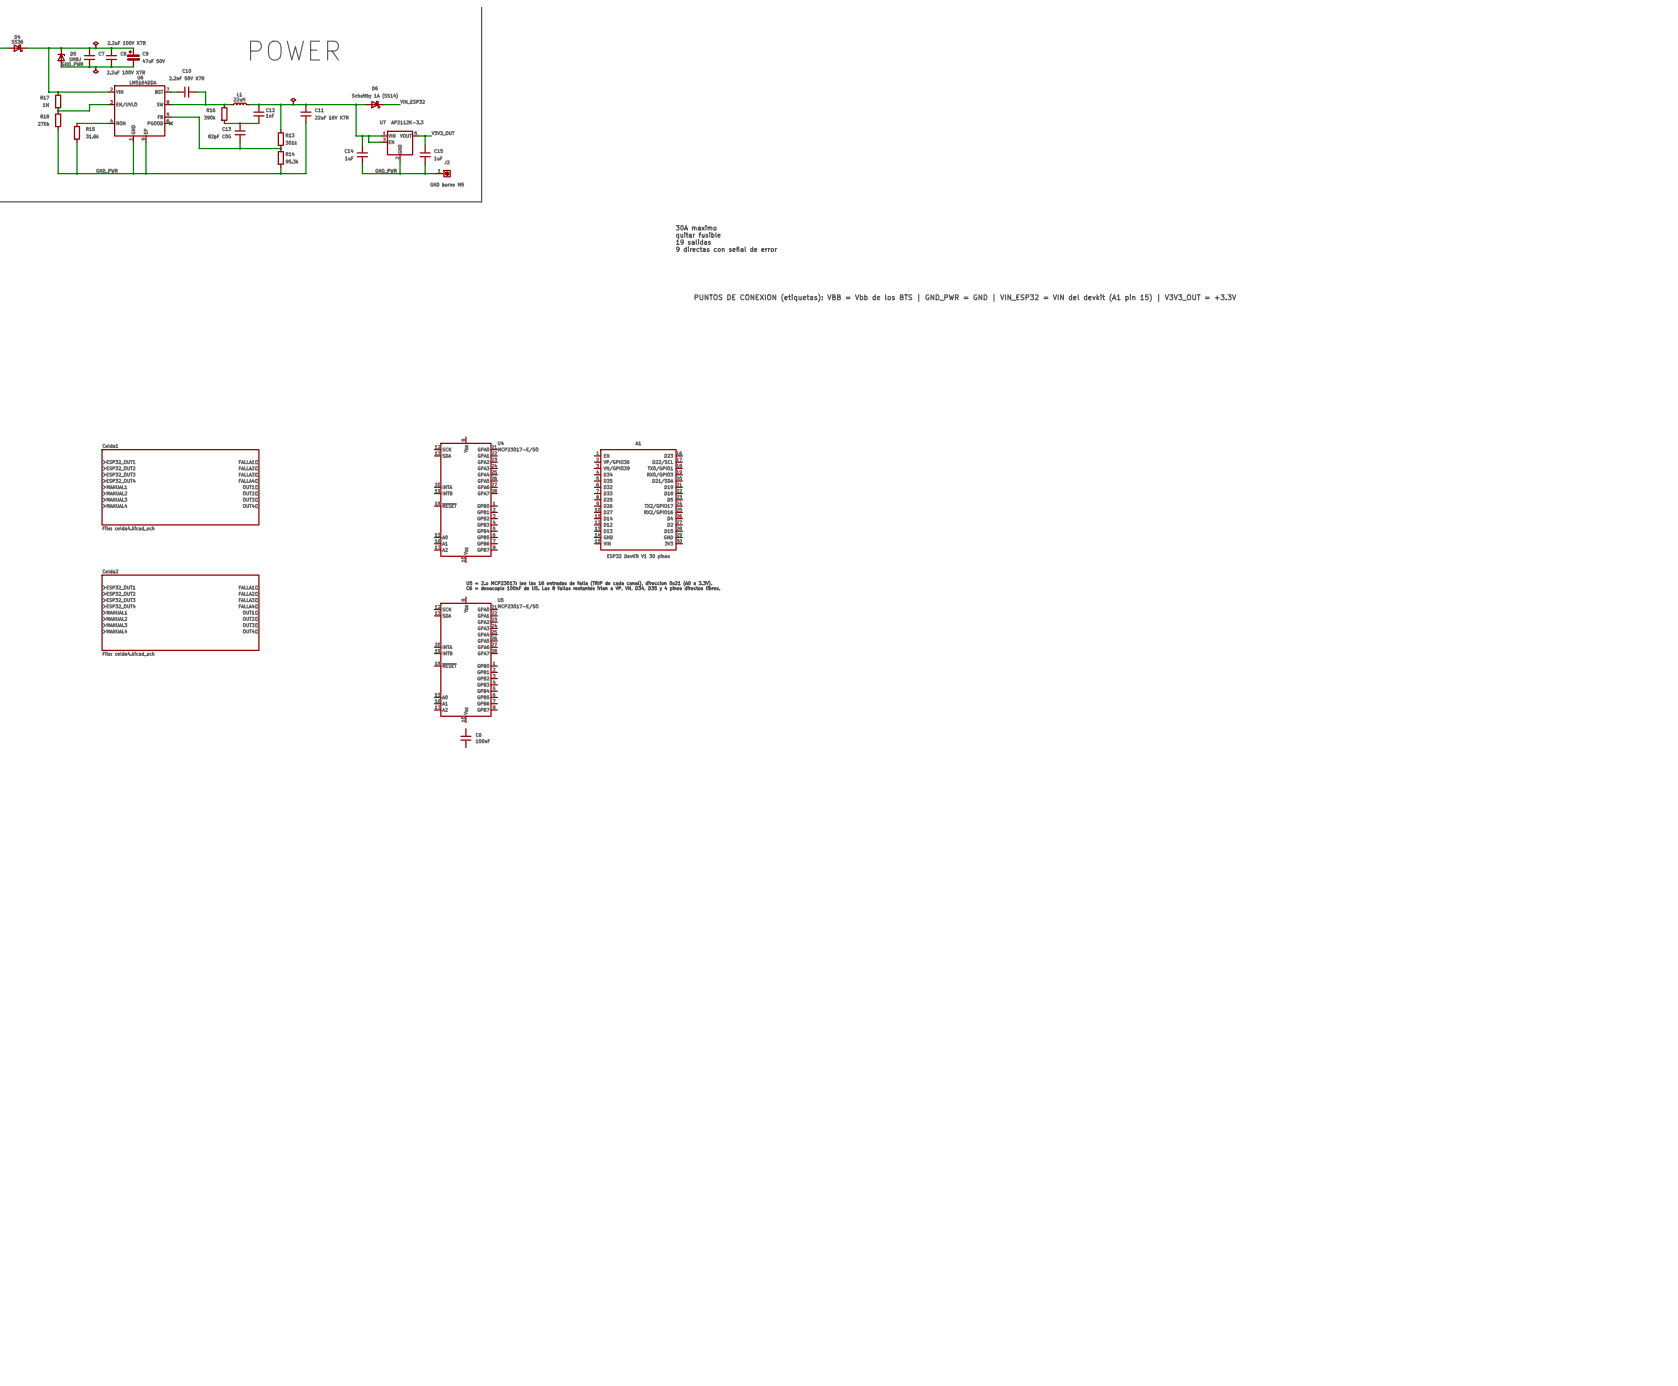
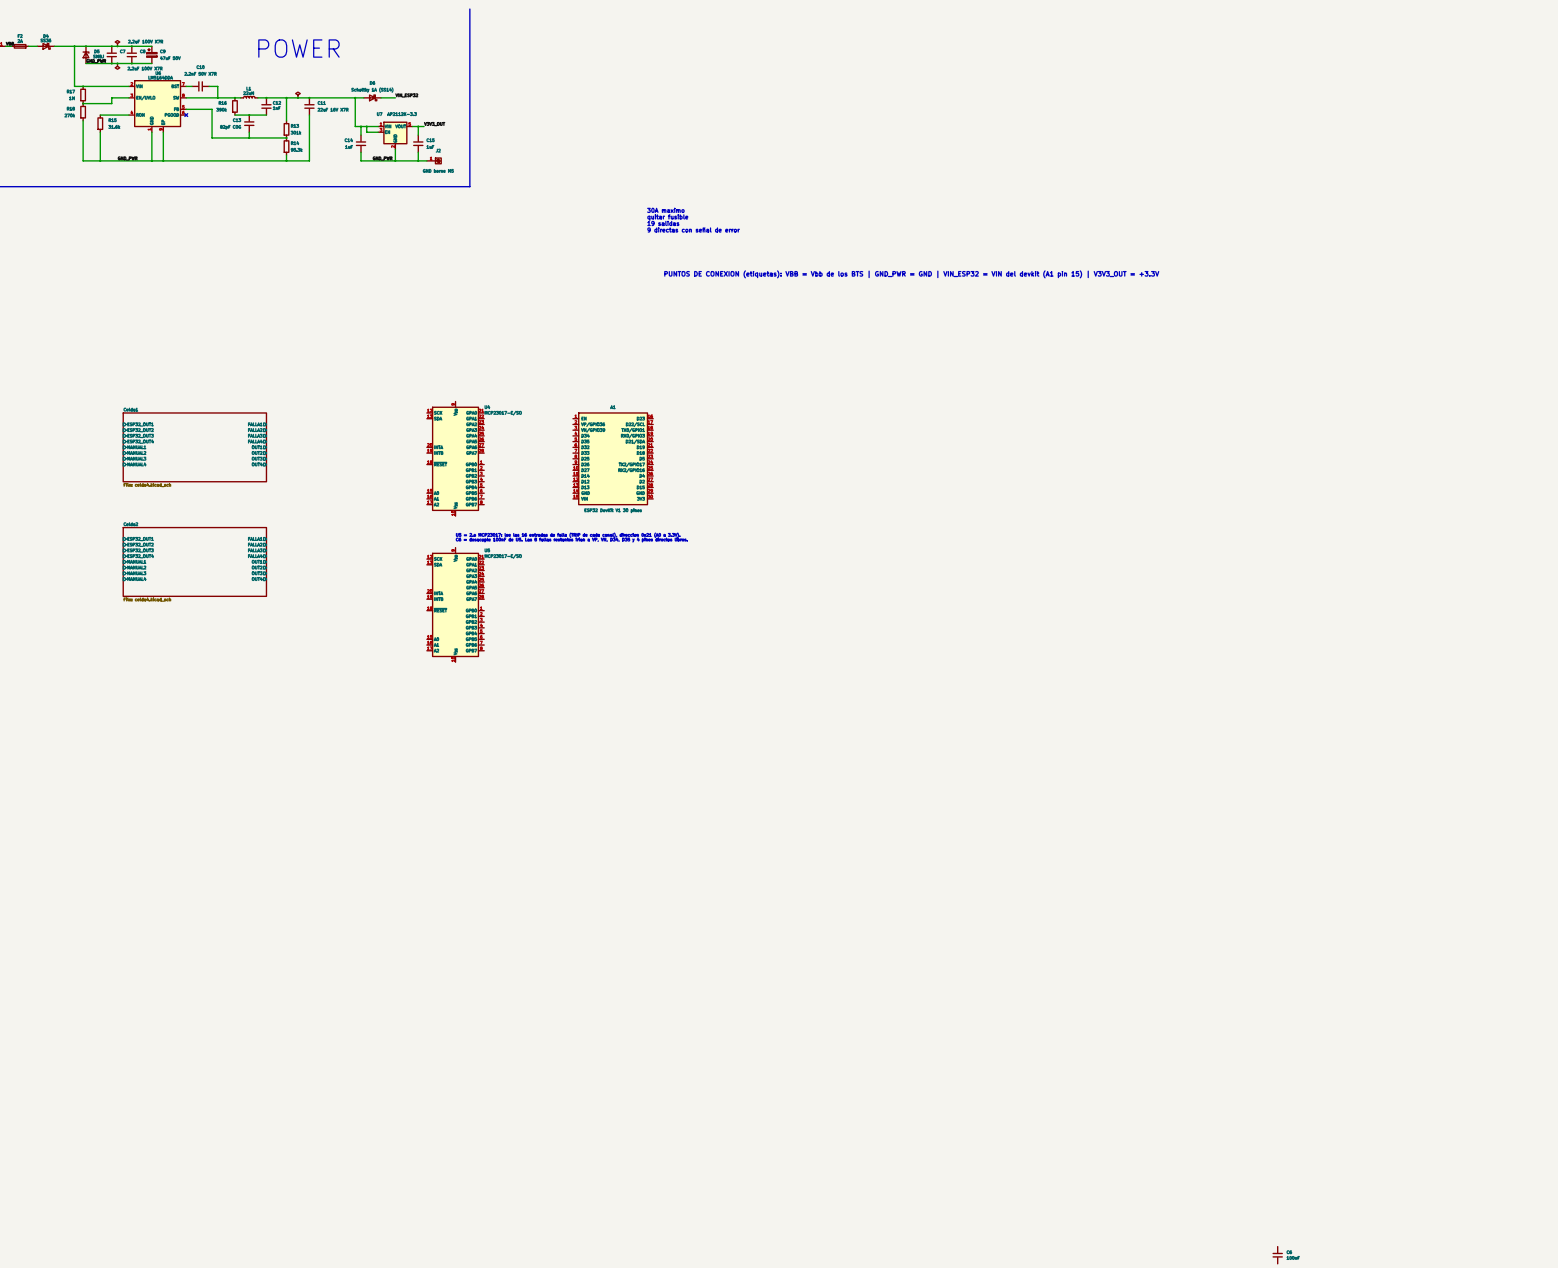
part position: (465, 738) -> (1277, 1255)

